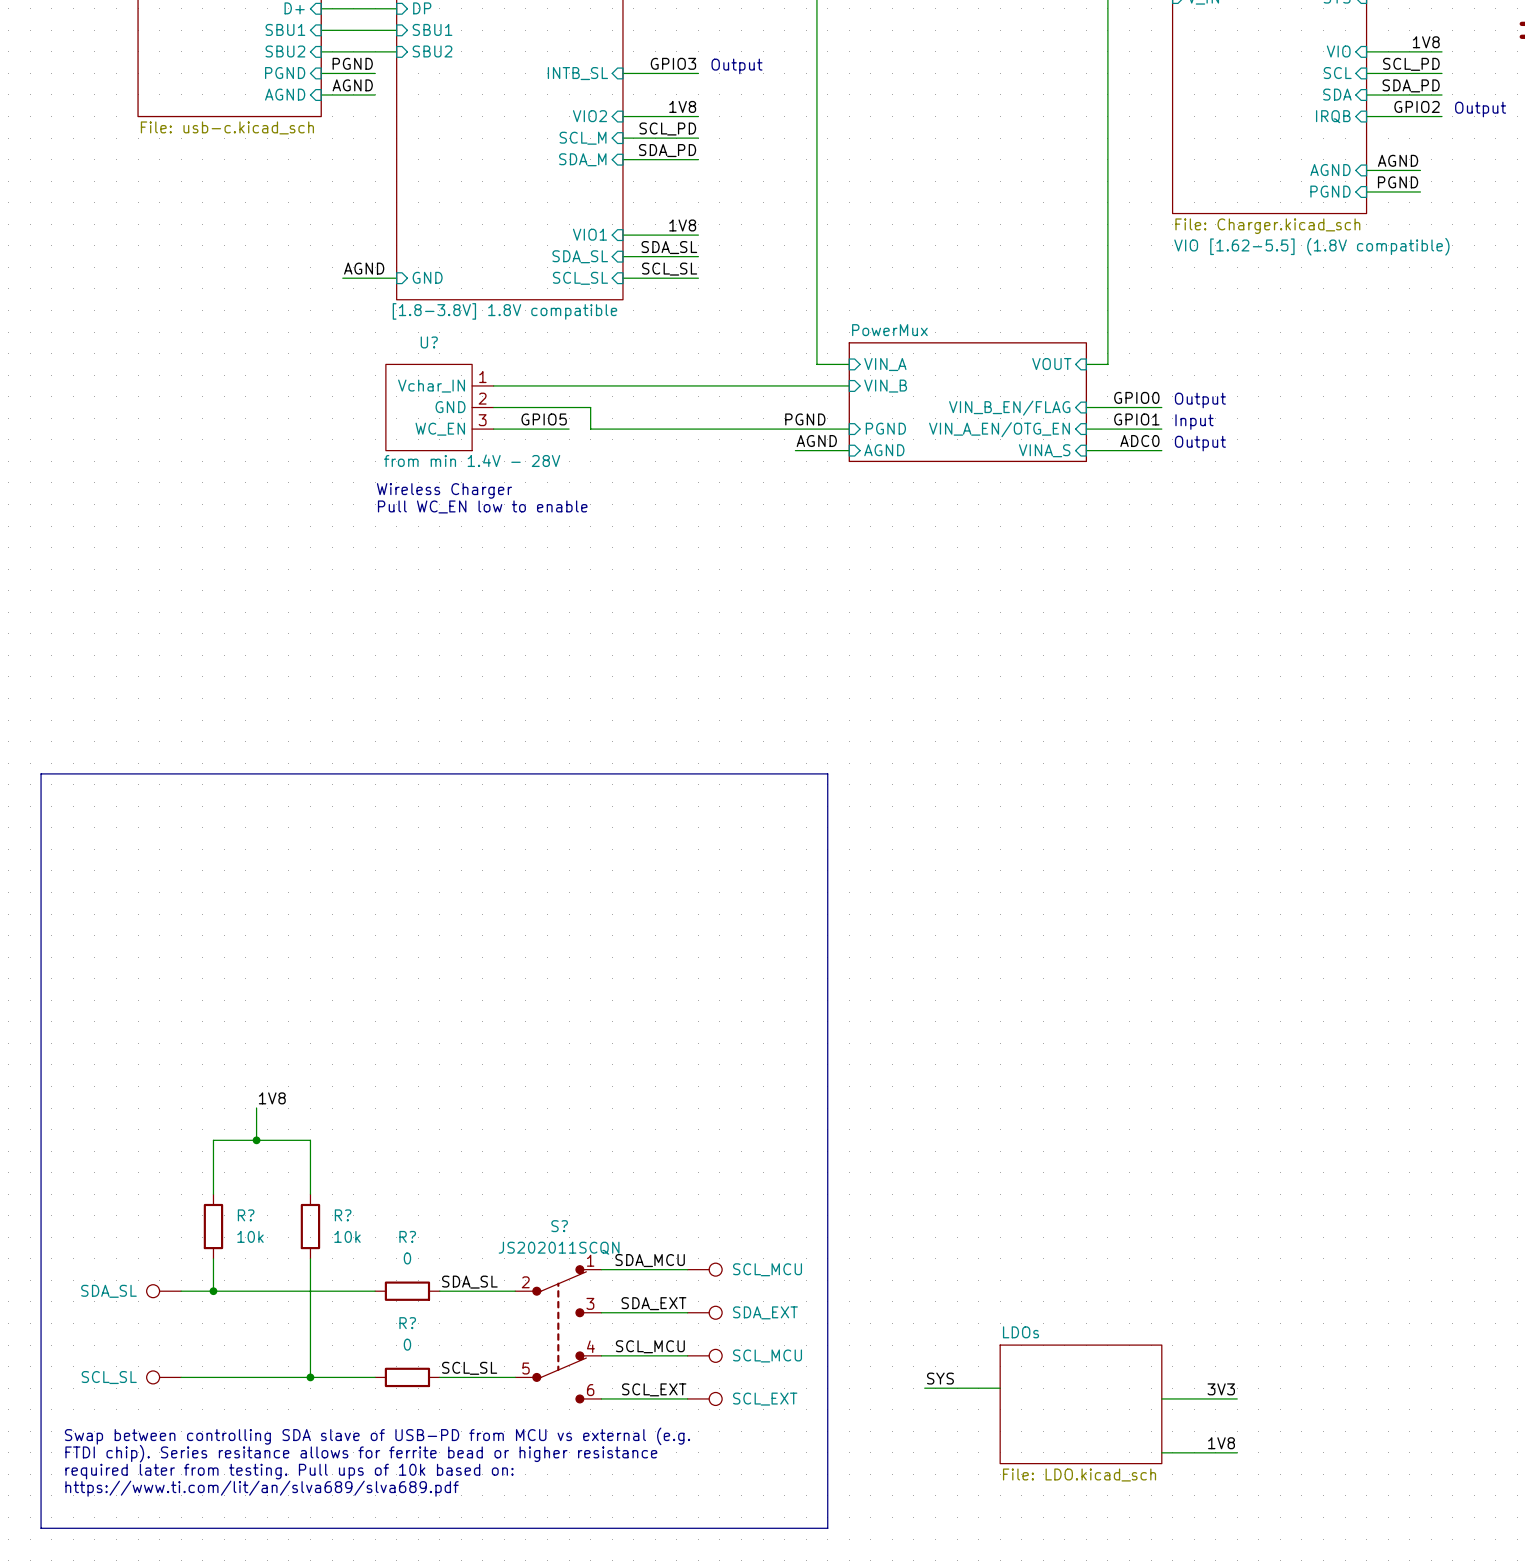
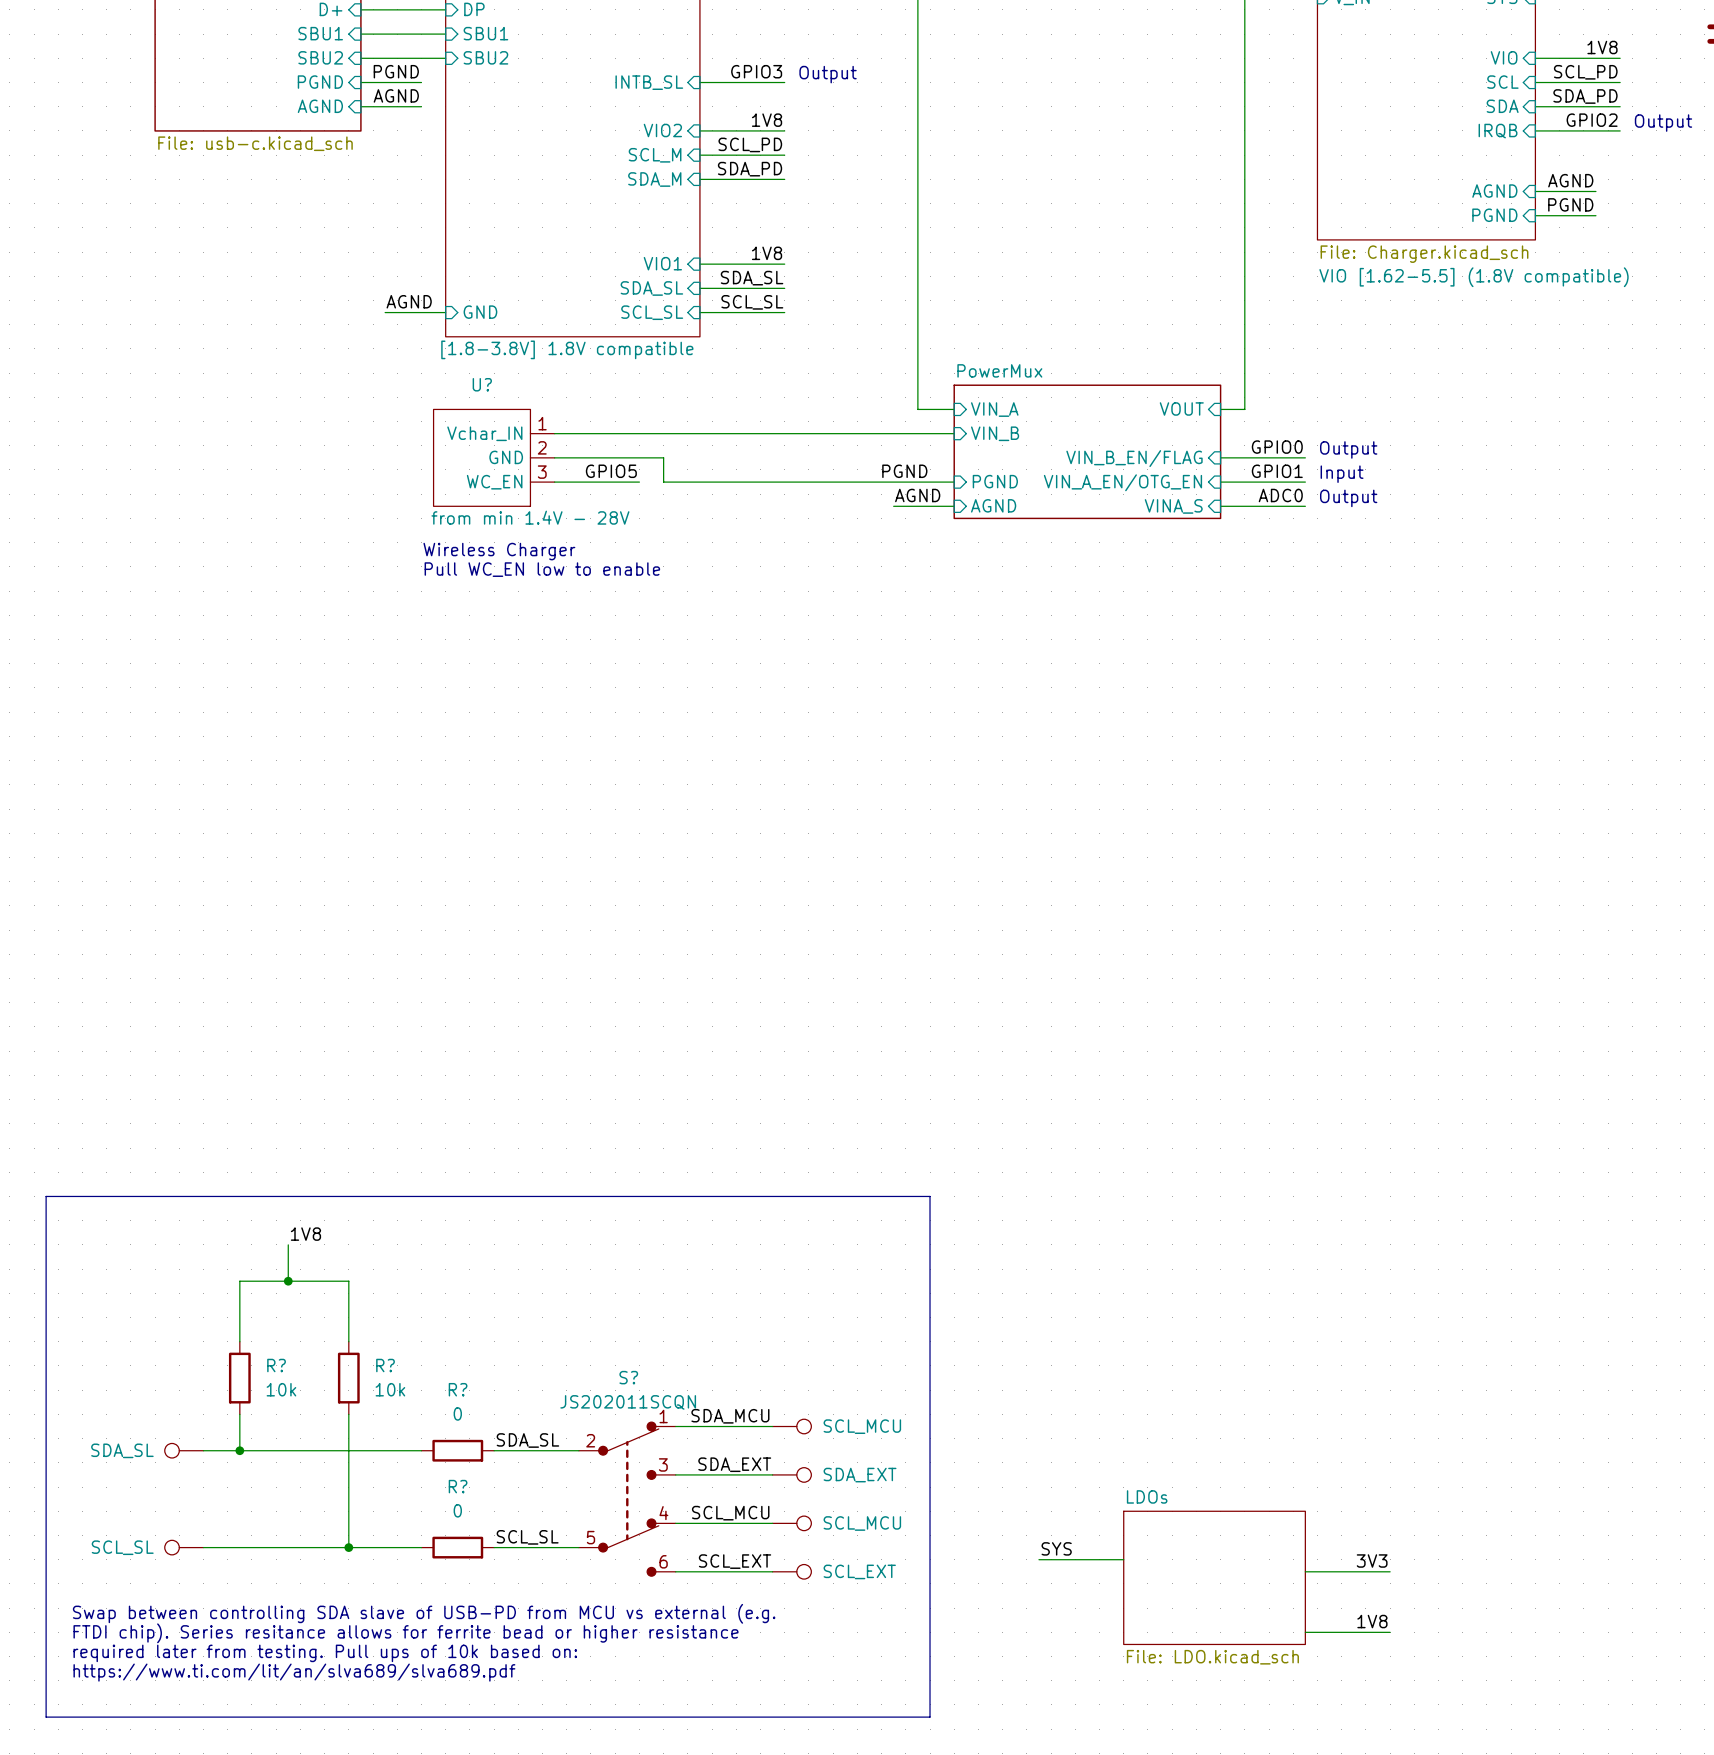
line: (41, 1064) (41, 773) (827, 773) (827, 1064) -> (46, 1196) (930, 1196)

